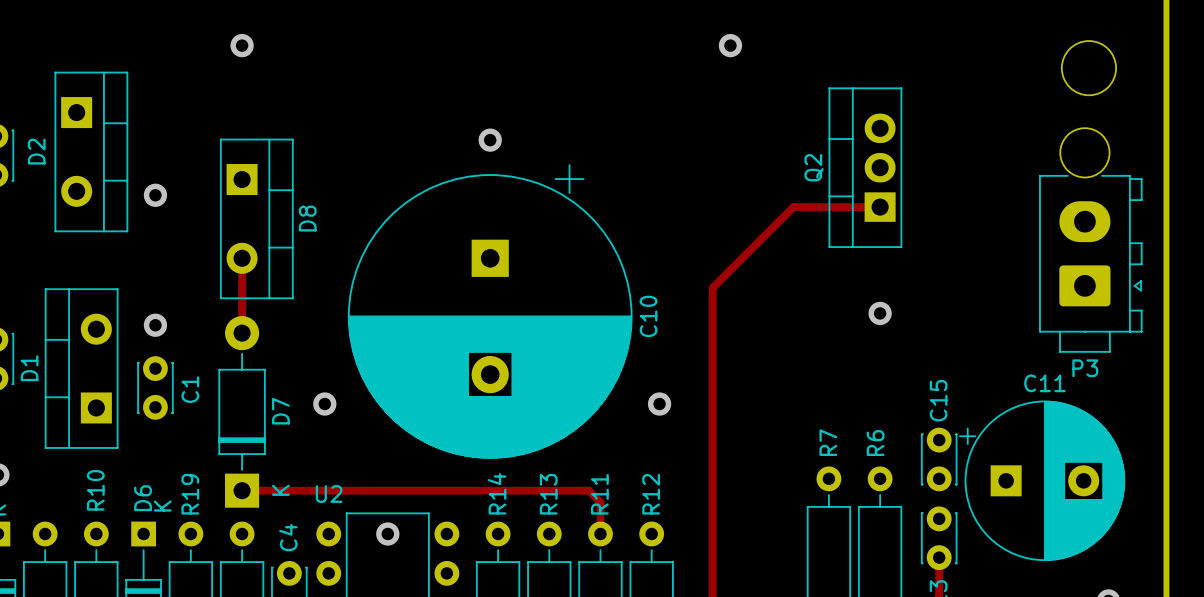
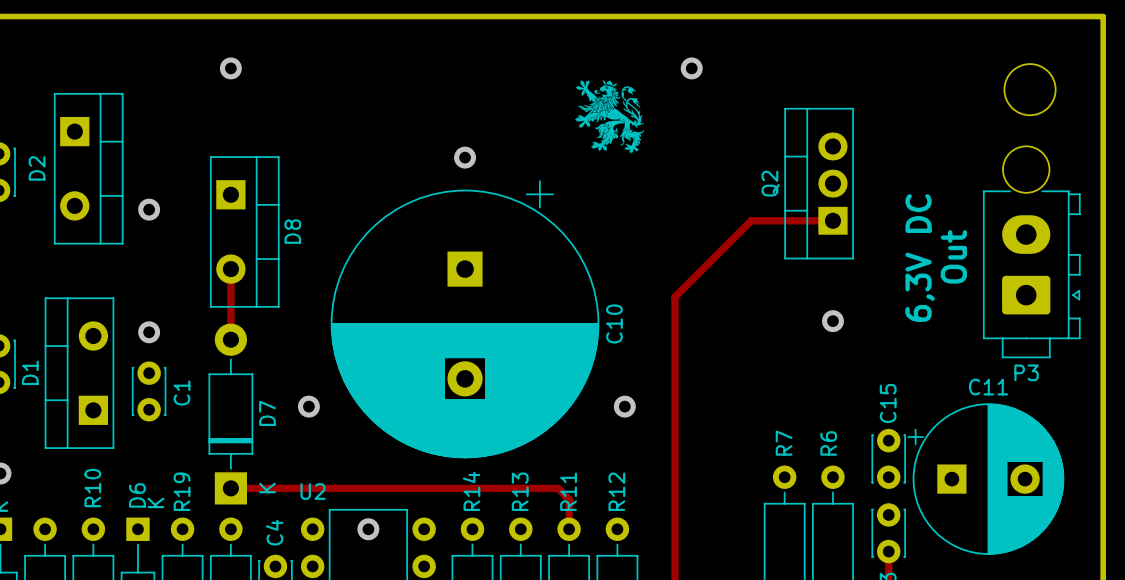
drawing: none -> [575, 80, 645, 154]
text: none -> Out (953, 256)
text: none -> 6,3V DC (920, 257)

